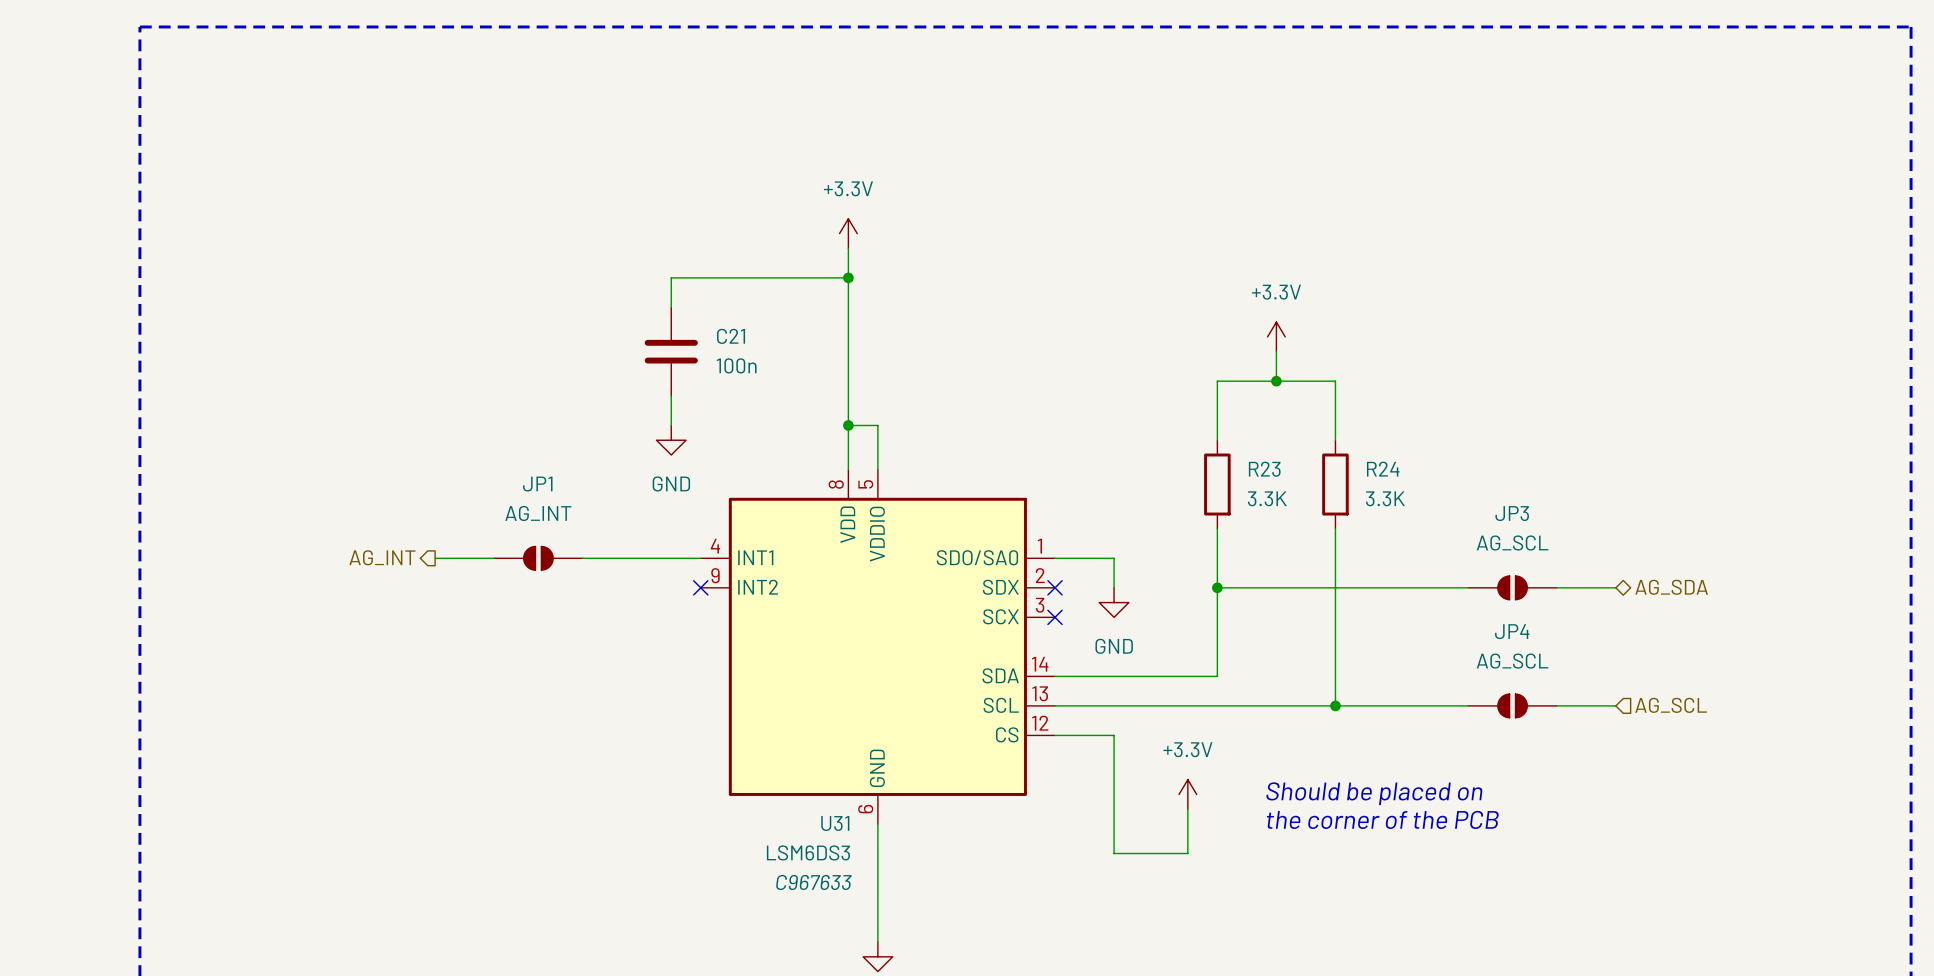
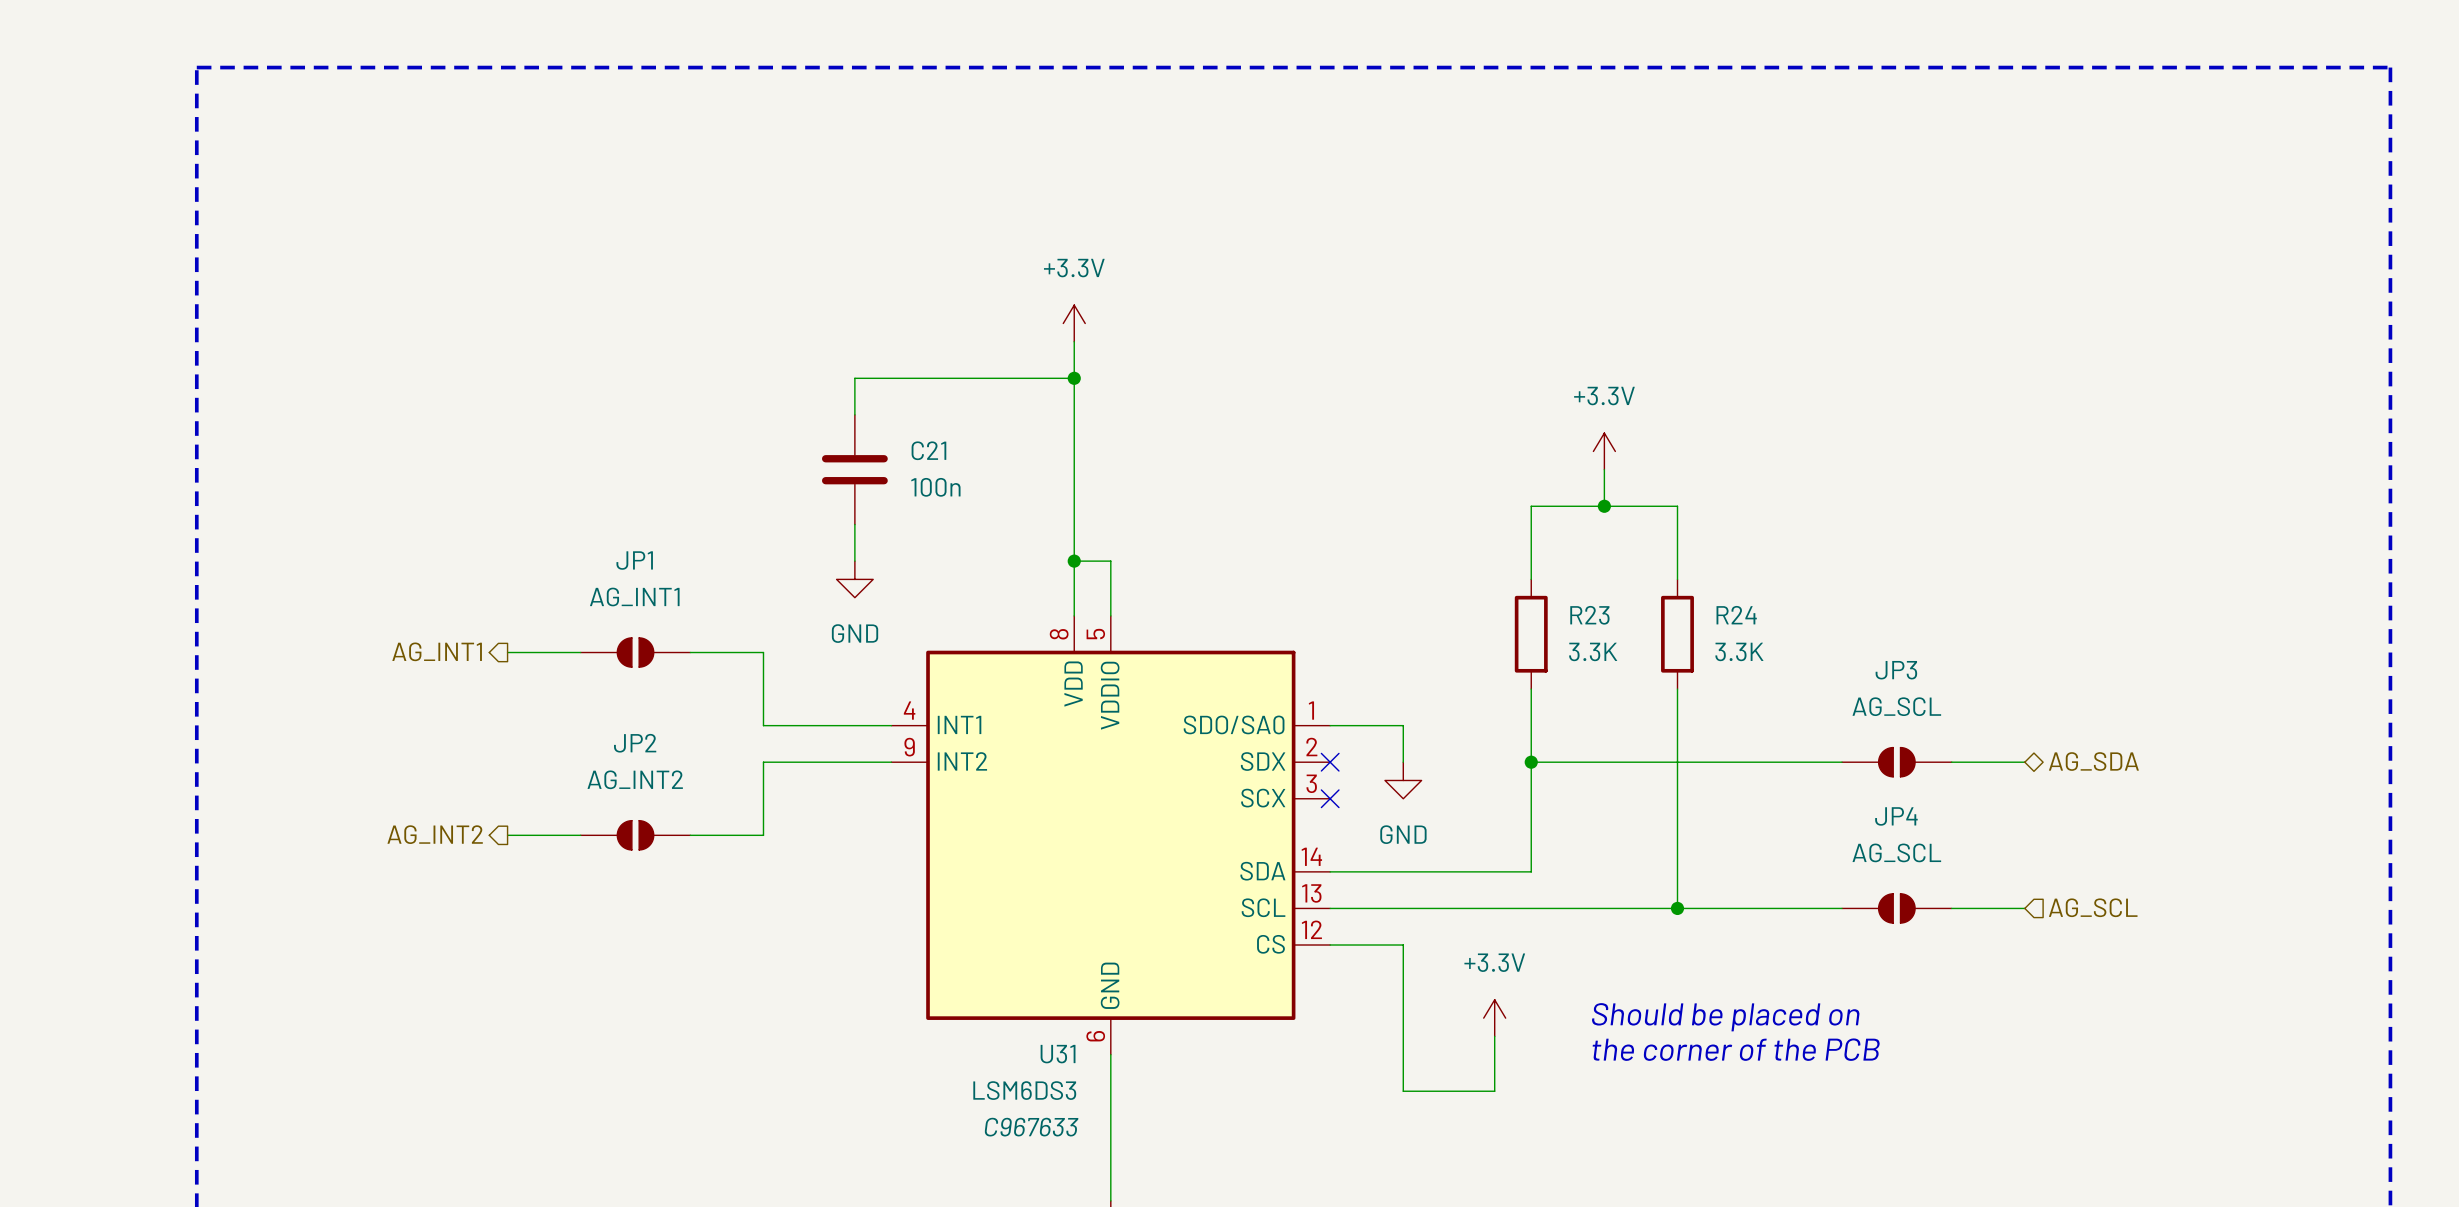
hierarchical label: none -> AG_INT1 (437, 651)
JP1 value: AG_INT (538, 513) -> AG_INT1 (634, 596)
hierarchical label: AG_INT (382, 557) -> none
wire: (435, 558) (494, 558) -> (507, 652) (580, 652)
JP1 position: (538, 558) -> (635, 652)
wire: (582, 558) (597, 558) -> (690, 652) (763, 652) (763, 725)
wire: none -> (891, 762) (763, 762) (763, 835) (690, 835)
no-connect mark: (700, 587) -> none
hierarchical label: none -> AG_INT2 (435, 834)
wire: none -> (507, 835) (580, 835)
JP2: none -> AG_INT2 (635, 835)

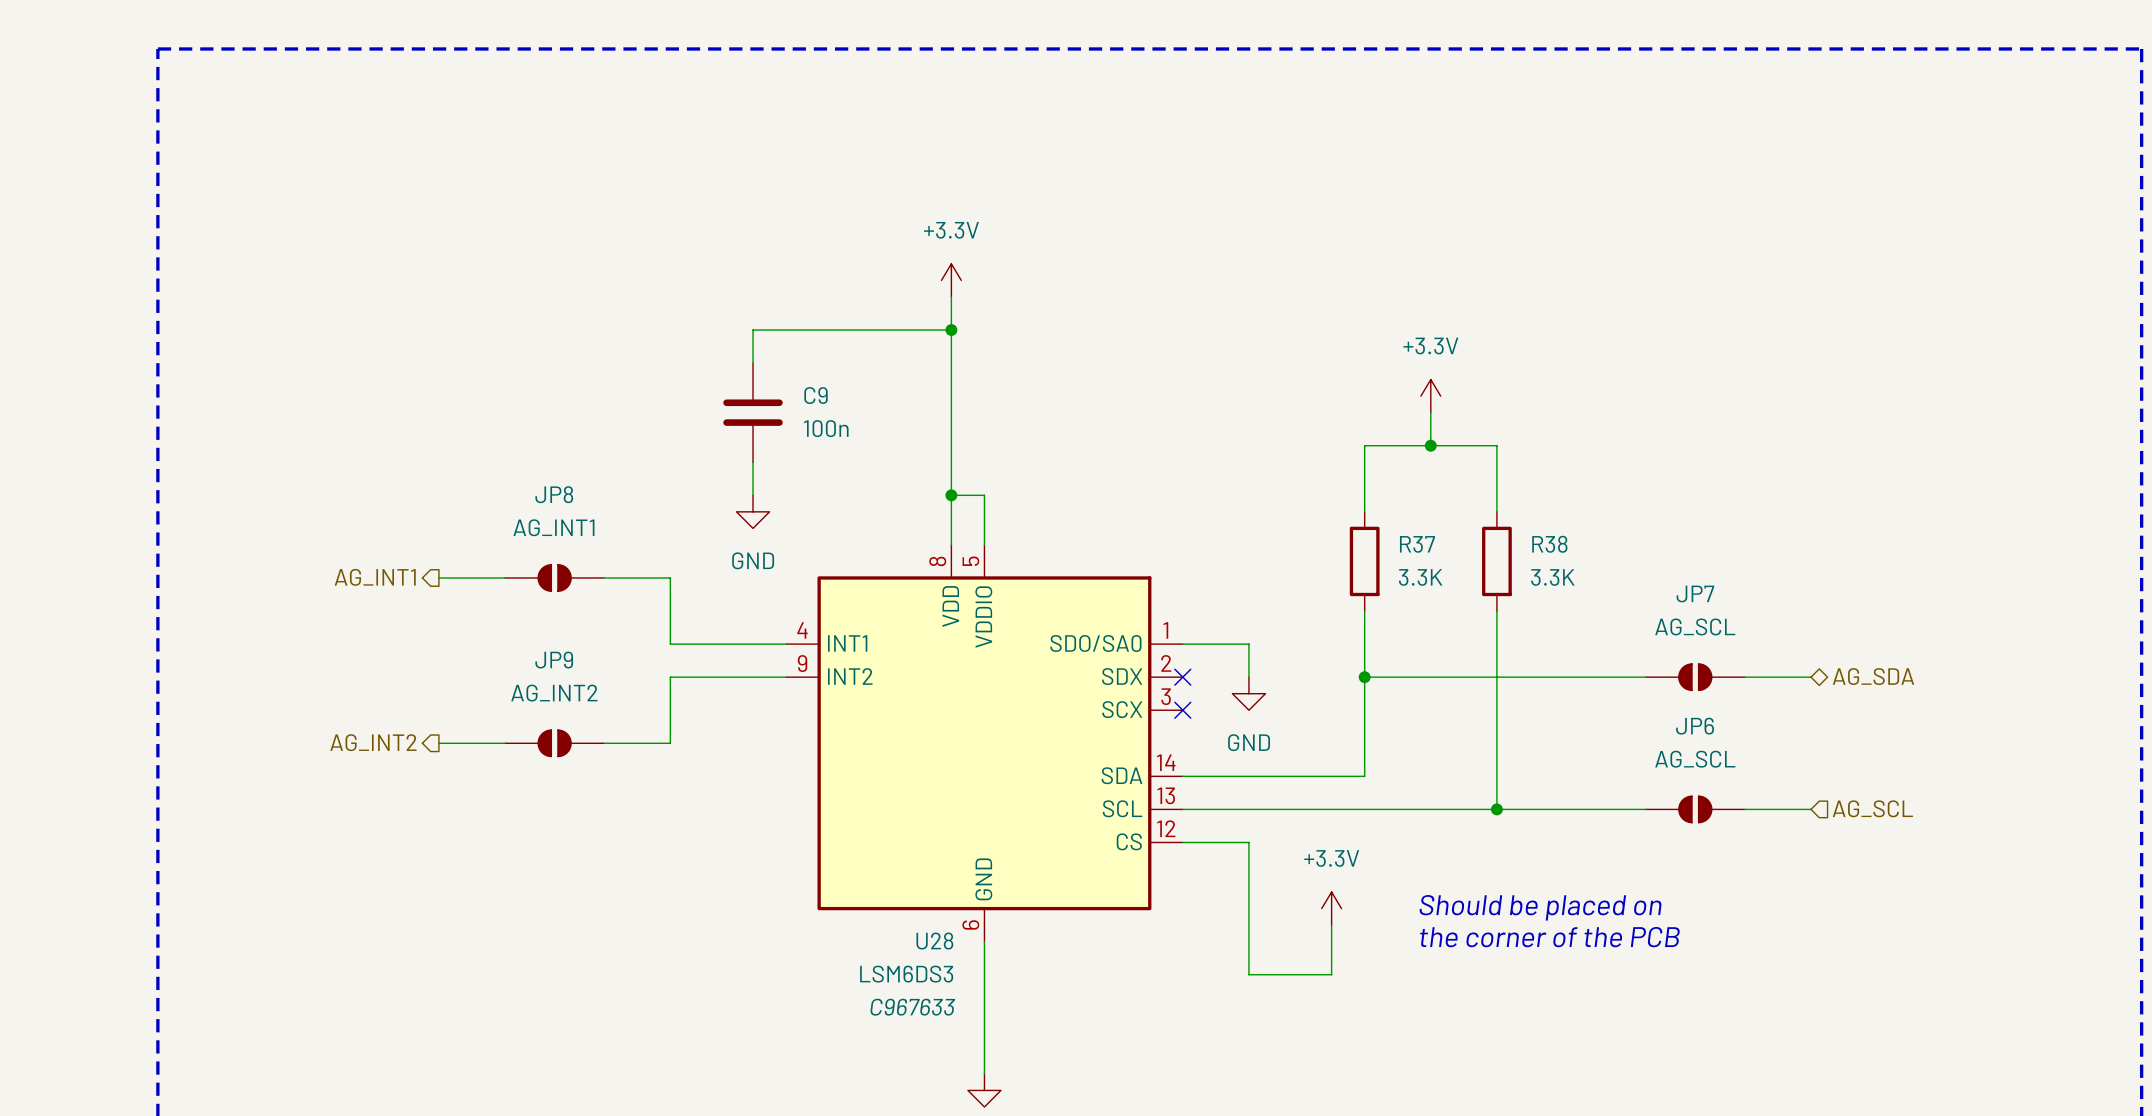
C21 name: C21 (928, 450) -> C9 (816, 395)
JP1 name: JP1 (634, 560) -> JP8 (554, 494)
R23 name: R23 (1589, 615) -> R37 (1417, 544)
R24 name: R24 (1736, 615) -> R38 (1549, 544)
JP3 name: JP3 (1896, 670) -> JP7 (1695, 593)
JP2 name: JP2 (635, 743) -> JP9 (554, 660)
JP4 name: JP4 (1896, 816) -> JP6 (1695, 726)
U31 name: U31 (1058, 1054) -> U28 (934, 941)

